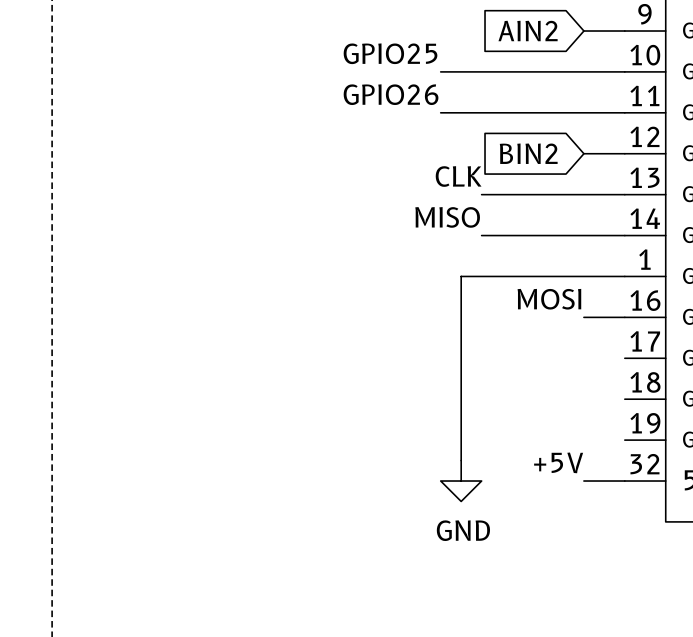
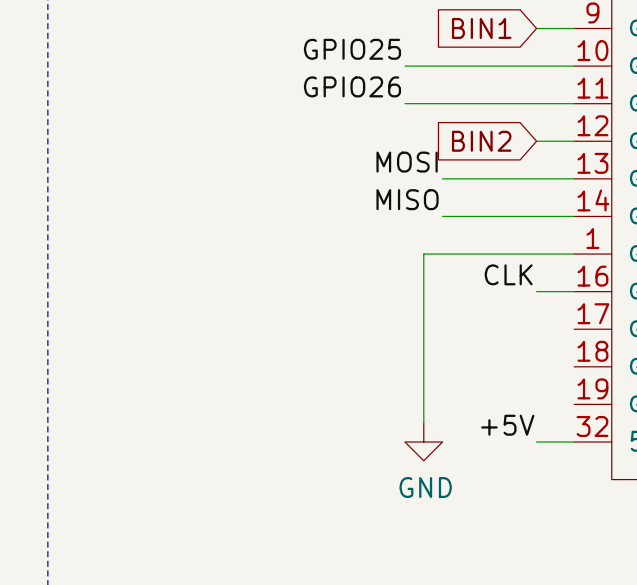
global label: AIN2 (528, 31) -> BIN1 (481, 28)
label: CLK (458, 176) -> MOSI (407, 162)
label: MOSI (549, 299) -> CLK (508, 274)

